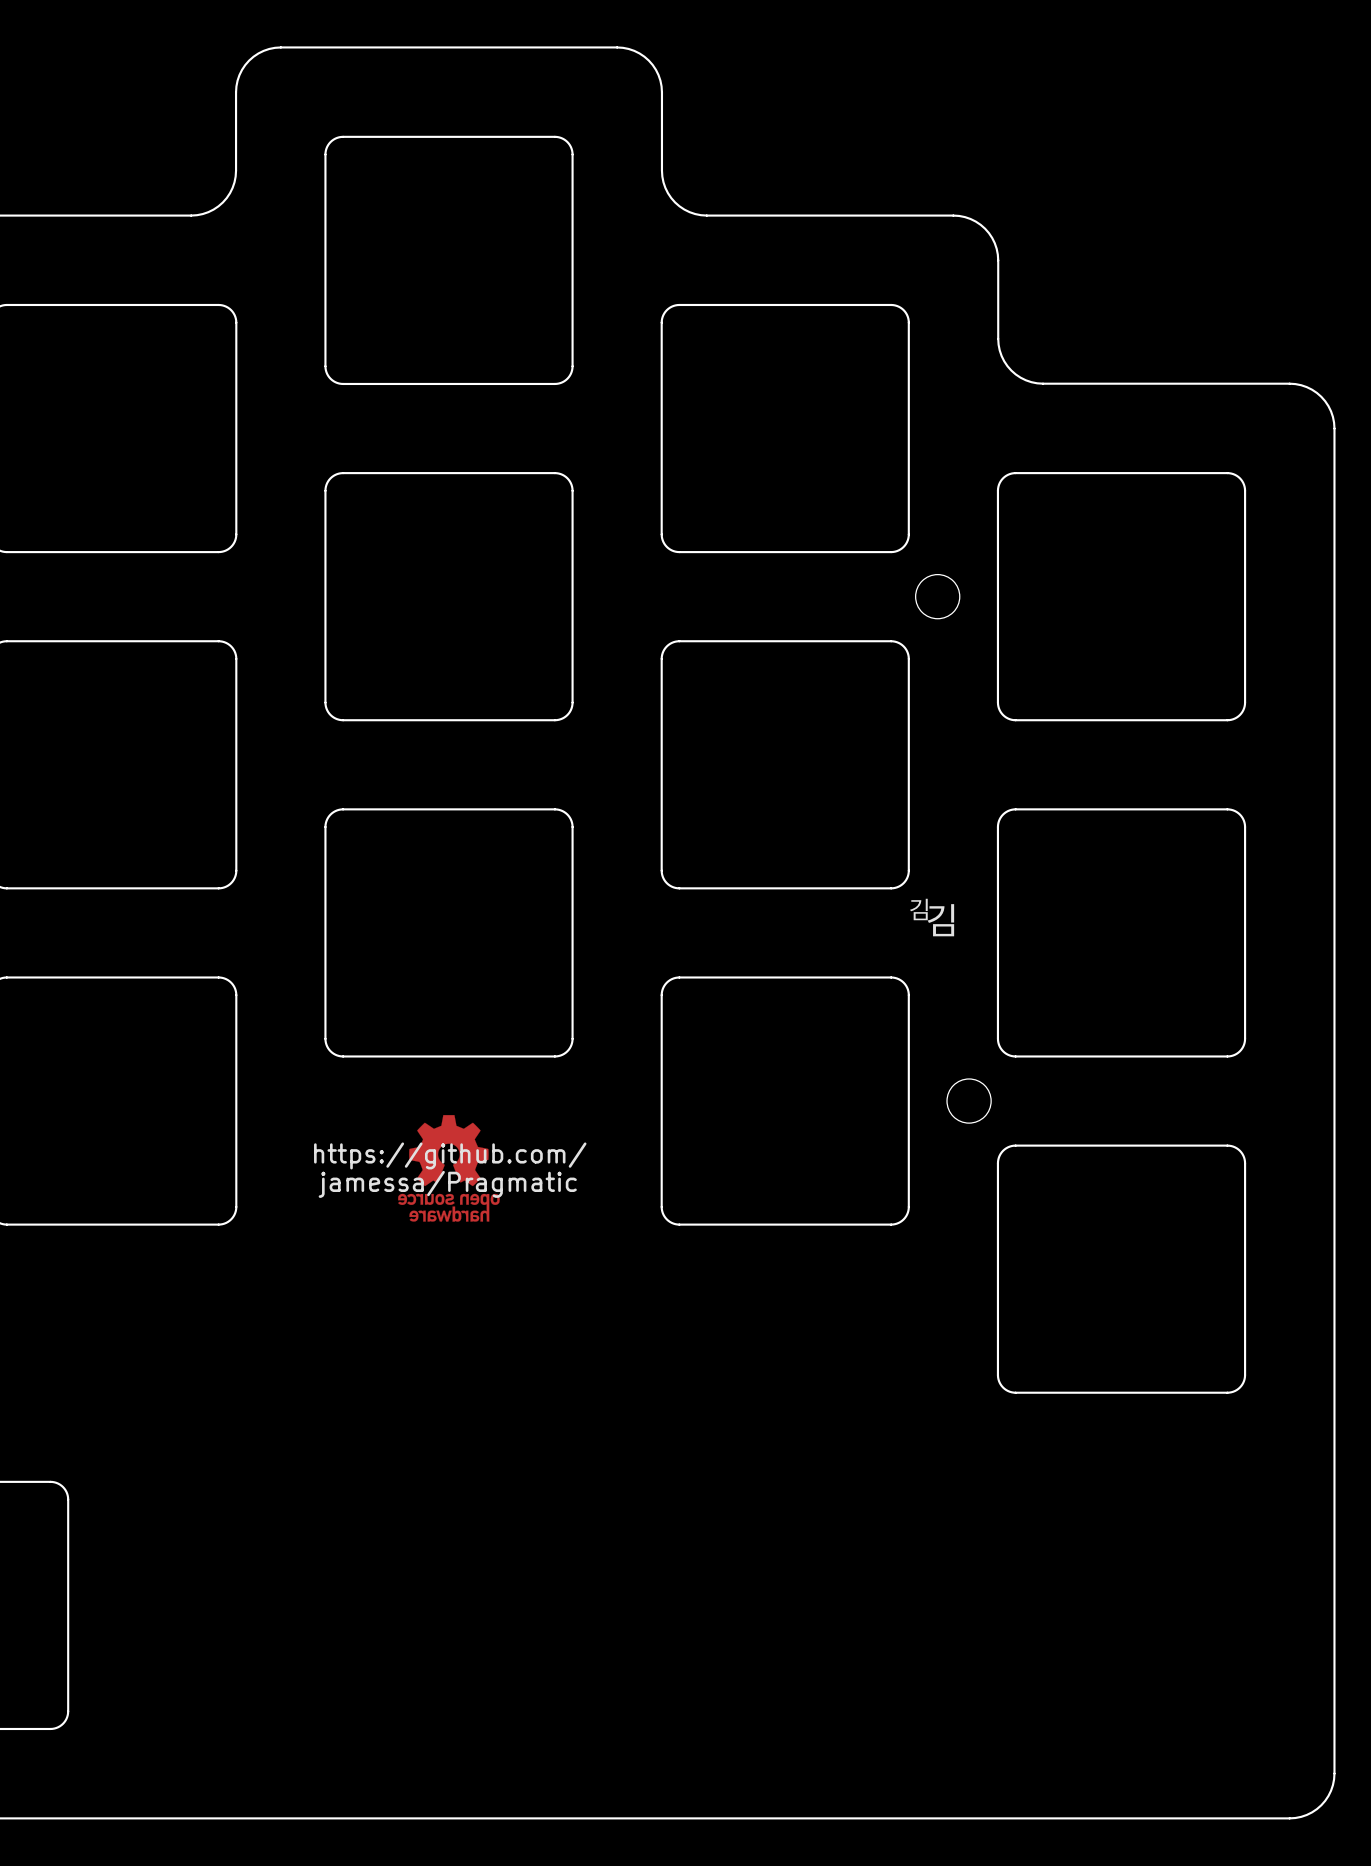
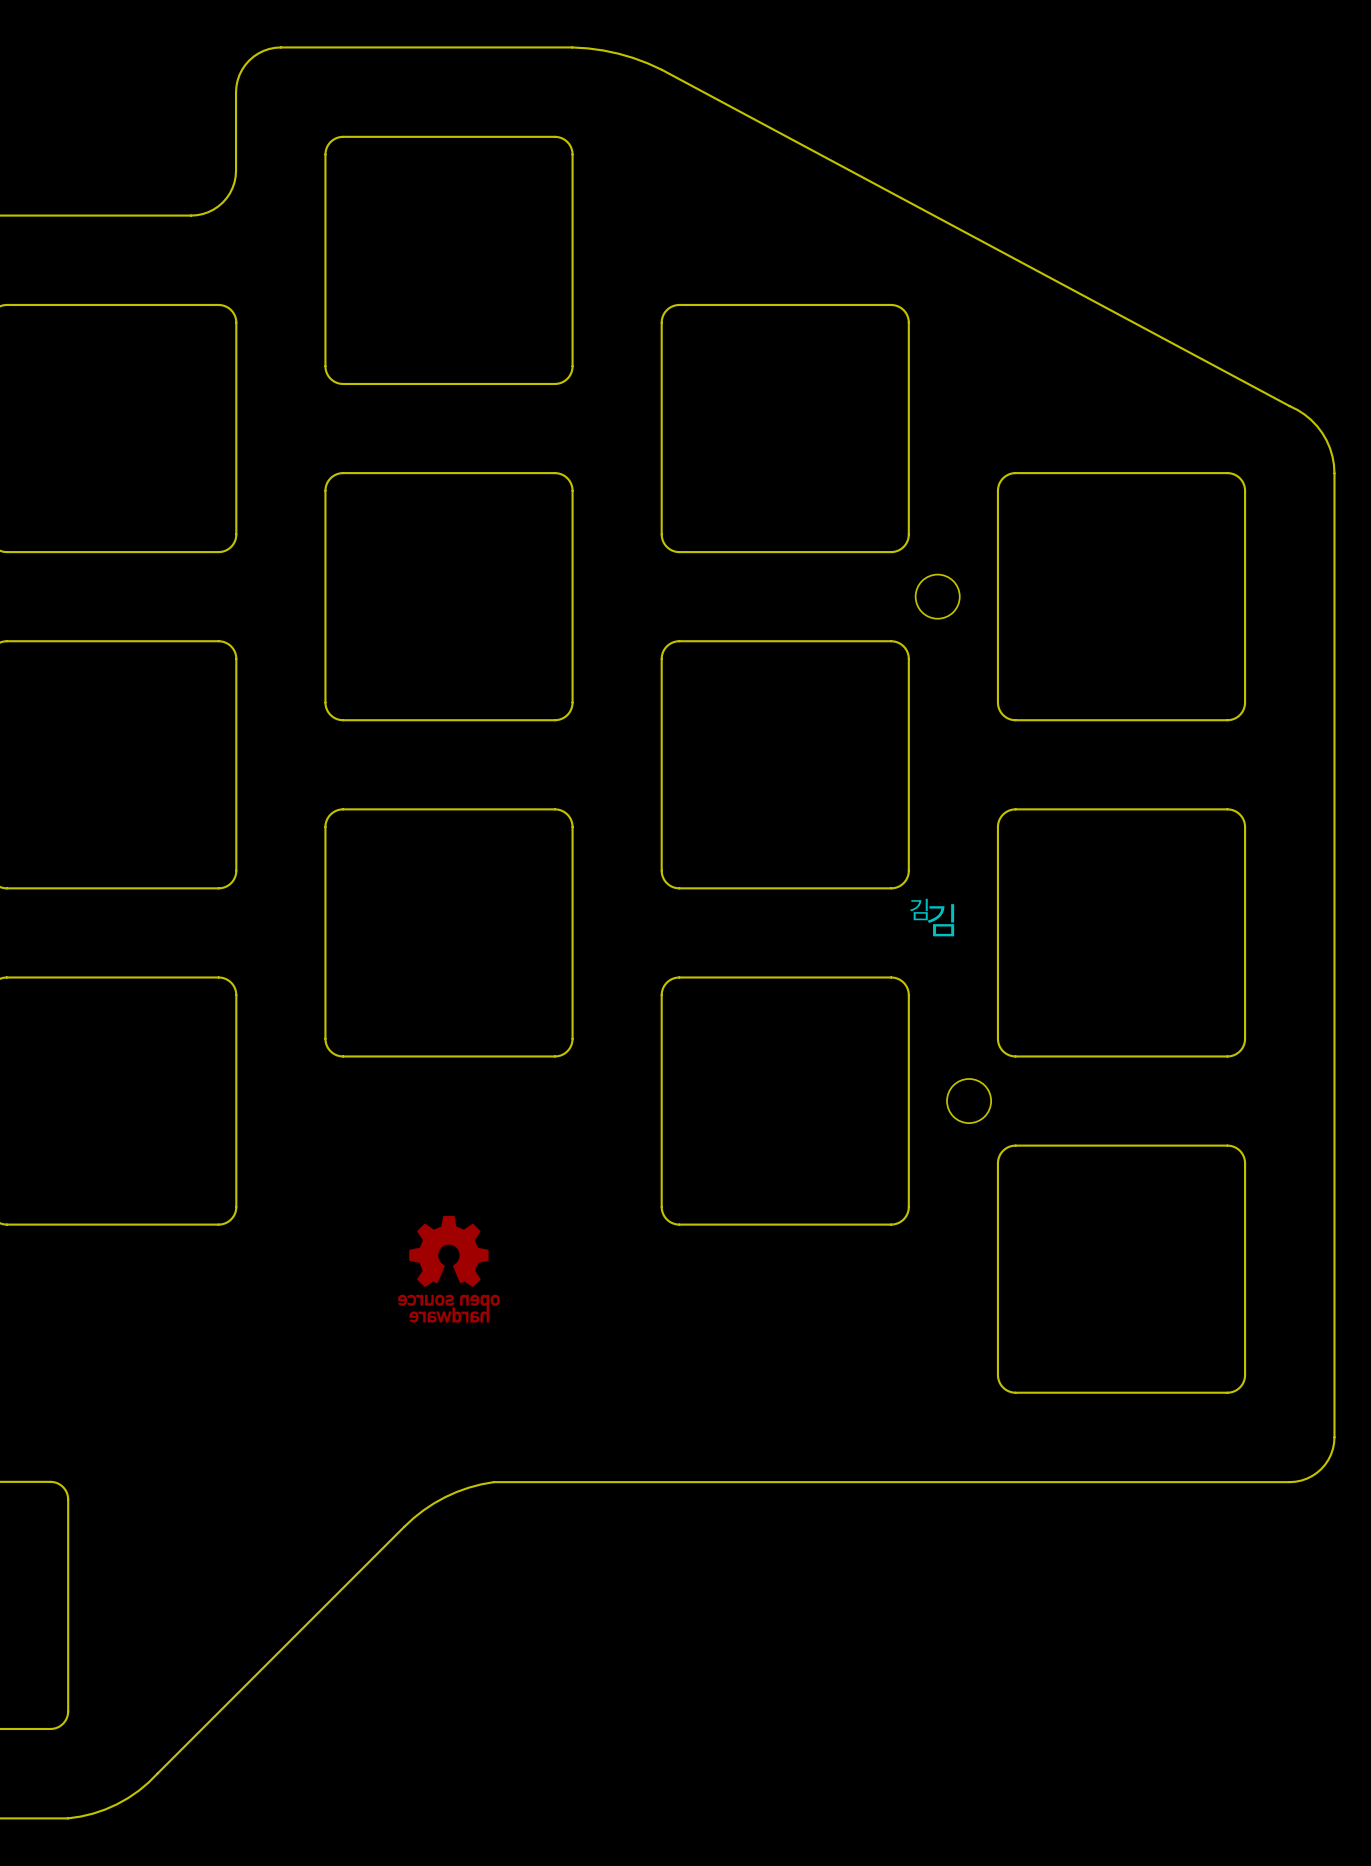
board edge: (572, 47) (628, 48) (644, 56) (652, 64) (658, 75) (661, 86) (663, 182) (671, 198) (684, 209) (695, 214) (706, 215) (953, 215) (970, 218) (980, 224) (988, 233) (996, 248) (998, 344) (1004, 361) (1015, 374) (1025, 380) (1043, 383) (1301, 385) (1316, 392) (1325, 401) (1331, 411) (1334, 428) (1334, 473) -> (572, 47) (618, 53) (661, 69) (1297, 409) (1311, 419) (1322, 432) (1329, 448) (1334, 473)
text: https://github.com/ (450, 1155) -> none
drawing position: (448, 1168) -> (448, 1269)
text: jamessa/Pragmatic (447, 1184) -> none
board edge: (1334, 1437) (1334, 1779) (1331, 1790) (1321, 1805) (1312, 1812) (1301, 1816) (1289, 1818) (67, 1818) -> (1334, 1437) (1331, 1454) (1321, 1469) (1306, 1478) (1289, 1482) (493, 1482) (468, 1487) (434, 1503) (413, 1518) (138, 1790) (105, 1809) (67, 1818)

